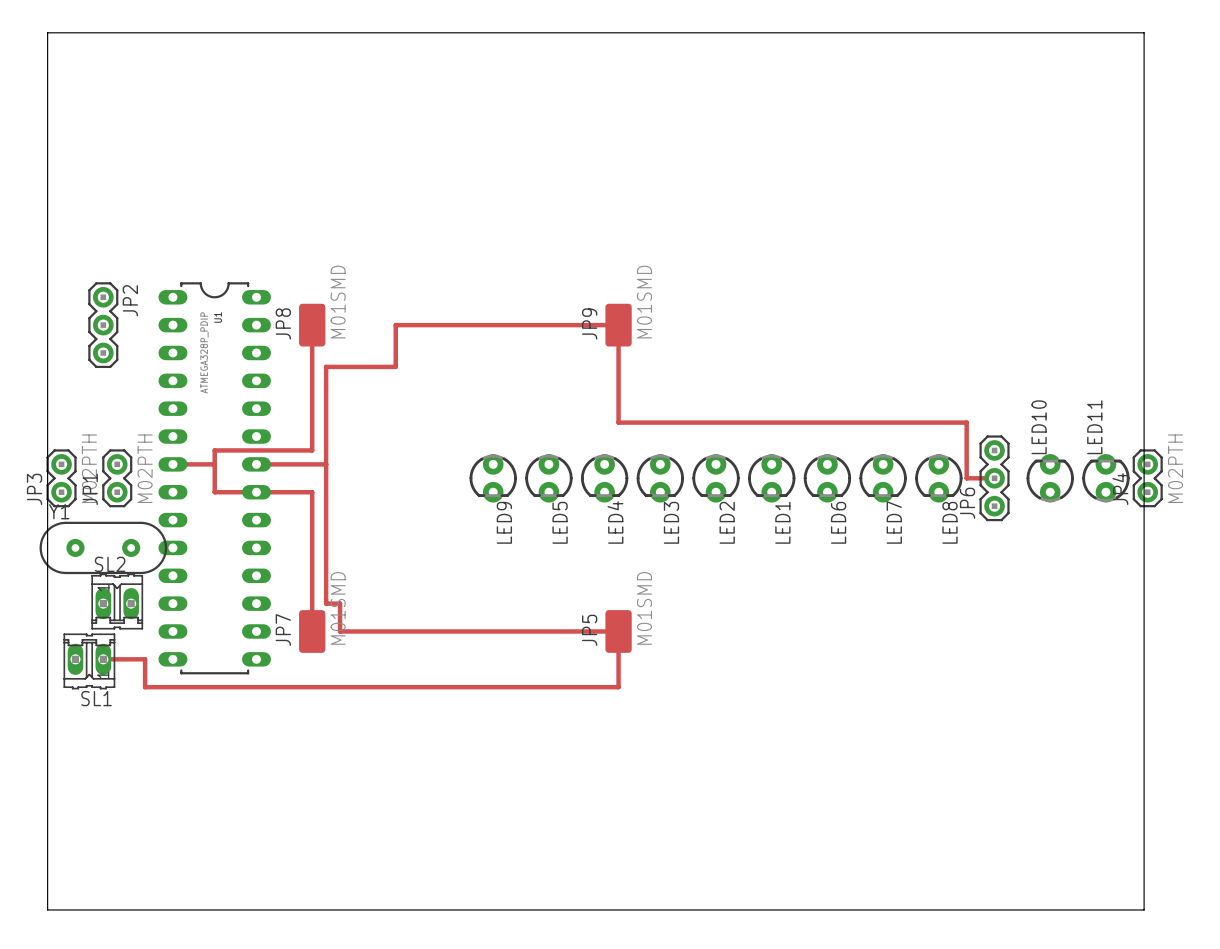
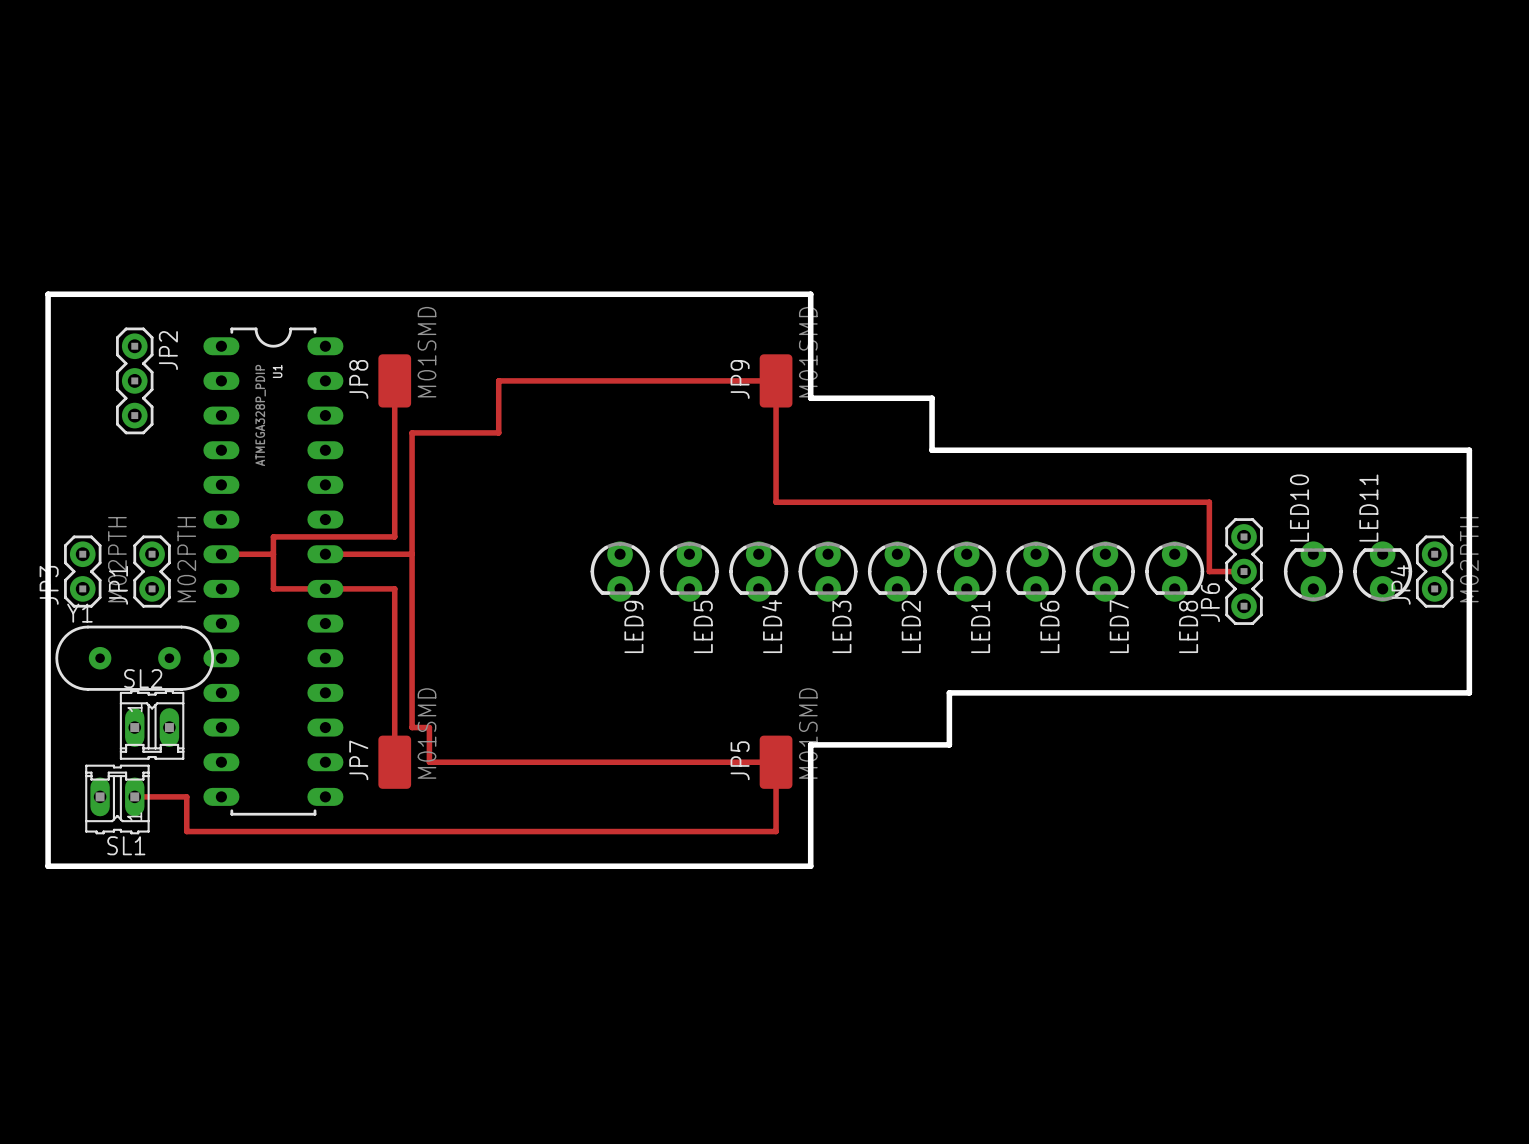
board edge: (47, 32) (1144, 32) (1144, 909) (47, 909) (47, 32) -> (48, 866) (48, 294) (810, 294) (810, 398) (932, 398) (932, 450) (1469, 450) (1469, 692) (949, 692) (949, 744) (810, 744) (810, 866) (48, 866)

